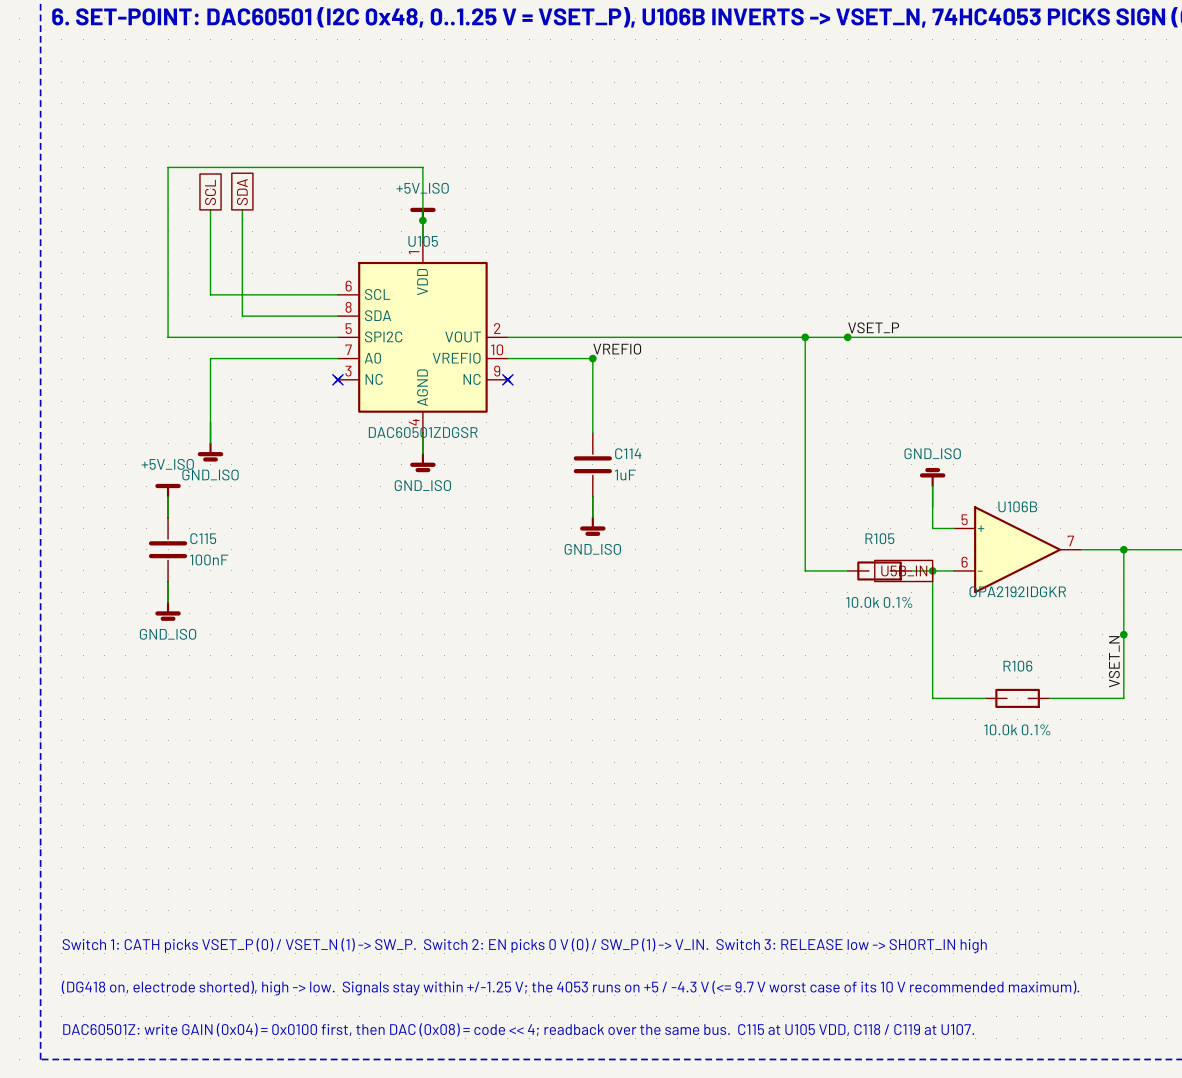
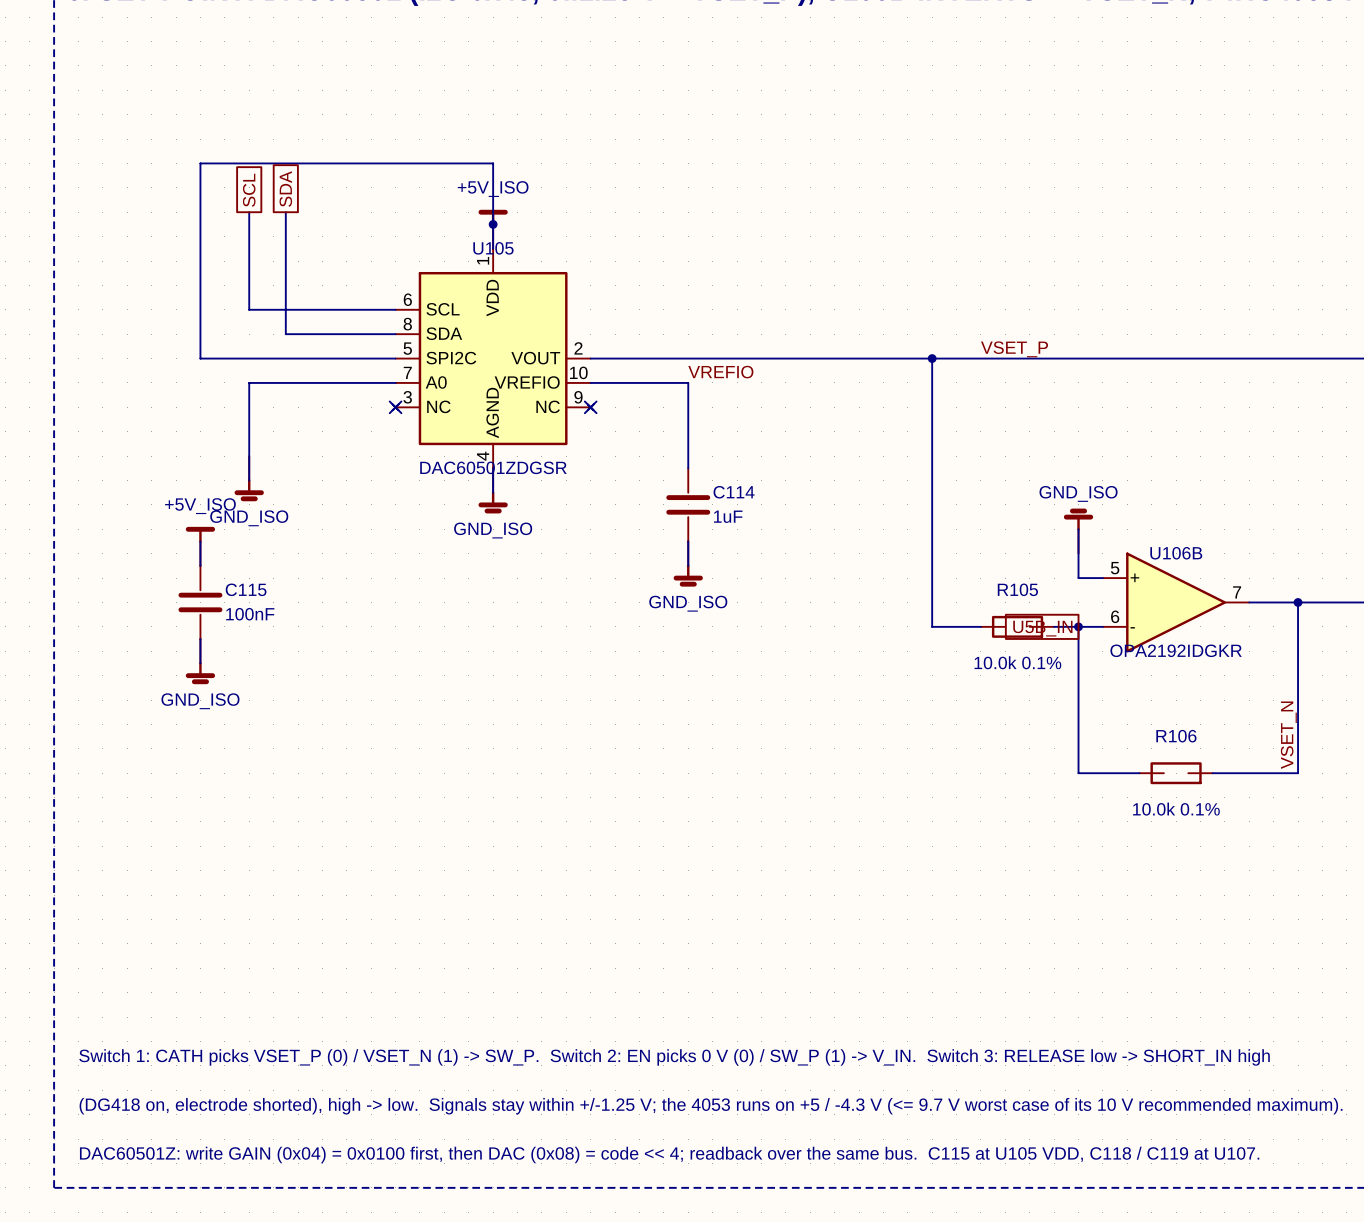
junction: (847, 337) -> none
junction: (592, 358) -> none
junction: (1123, 634) -> none

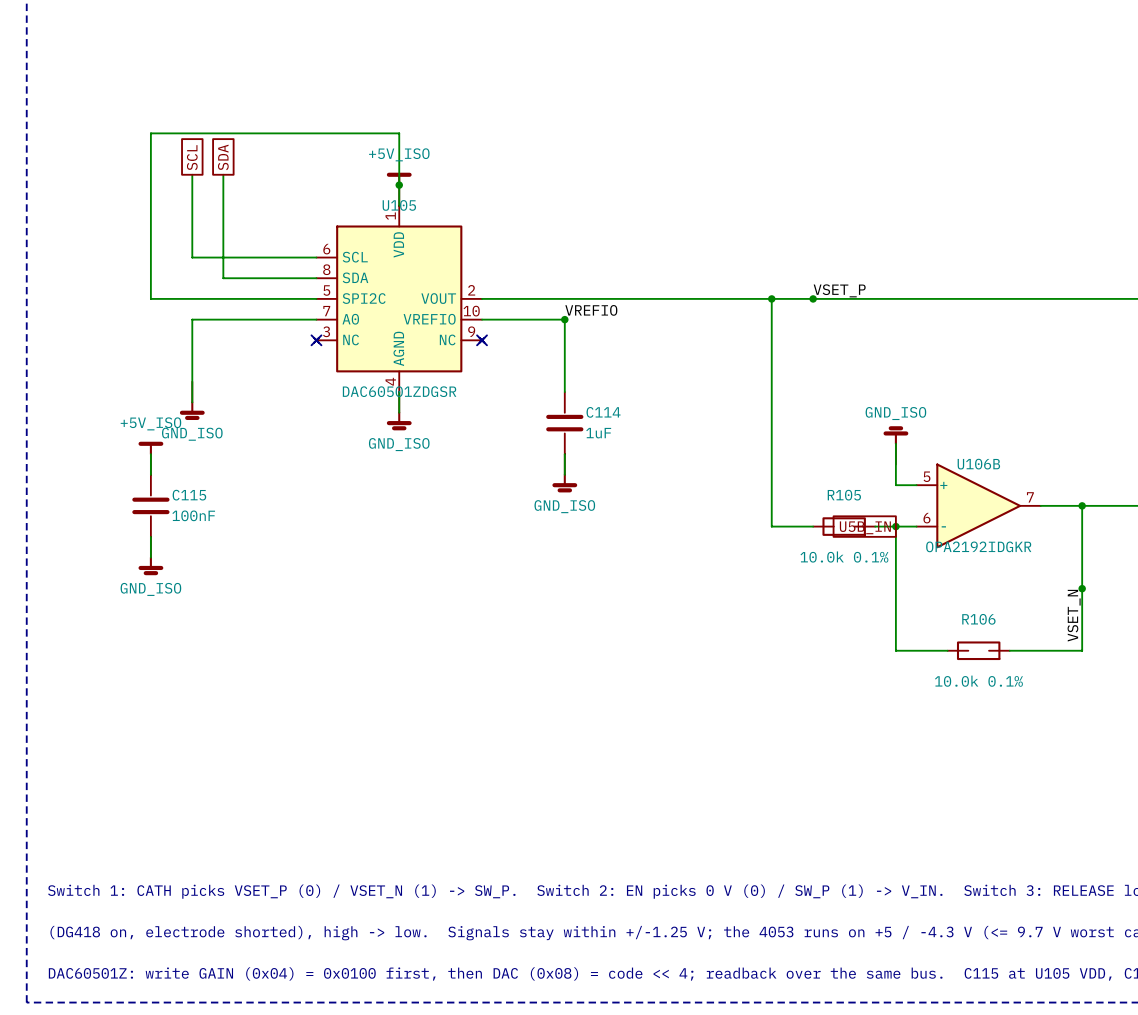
junction: none -> (813, 298)
junction: none -> (564, 319)
junction: none -> (1082, 588)

